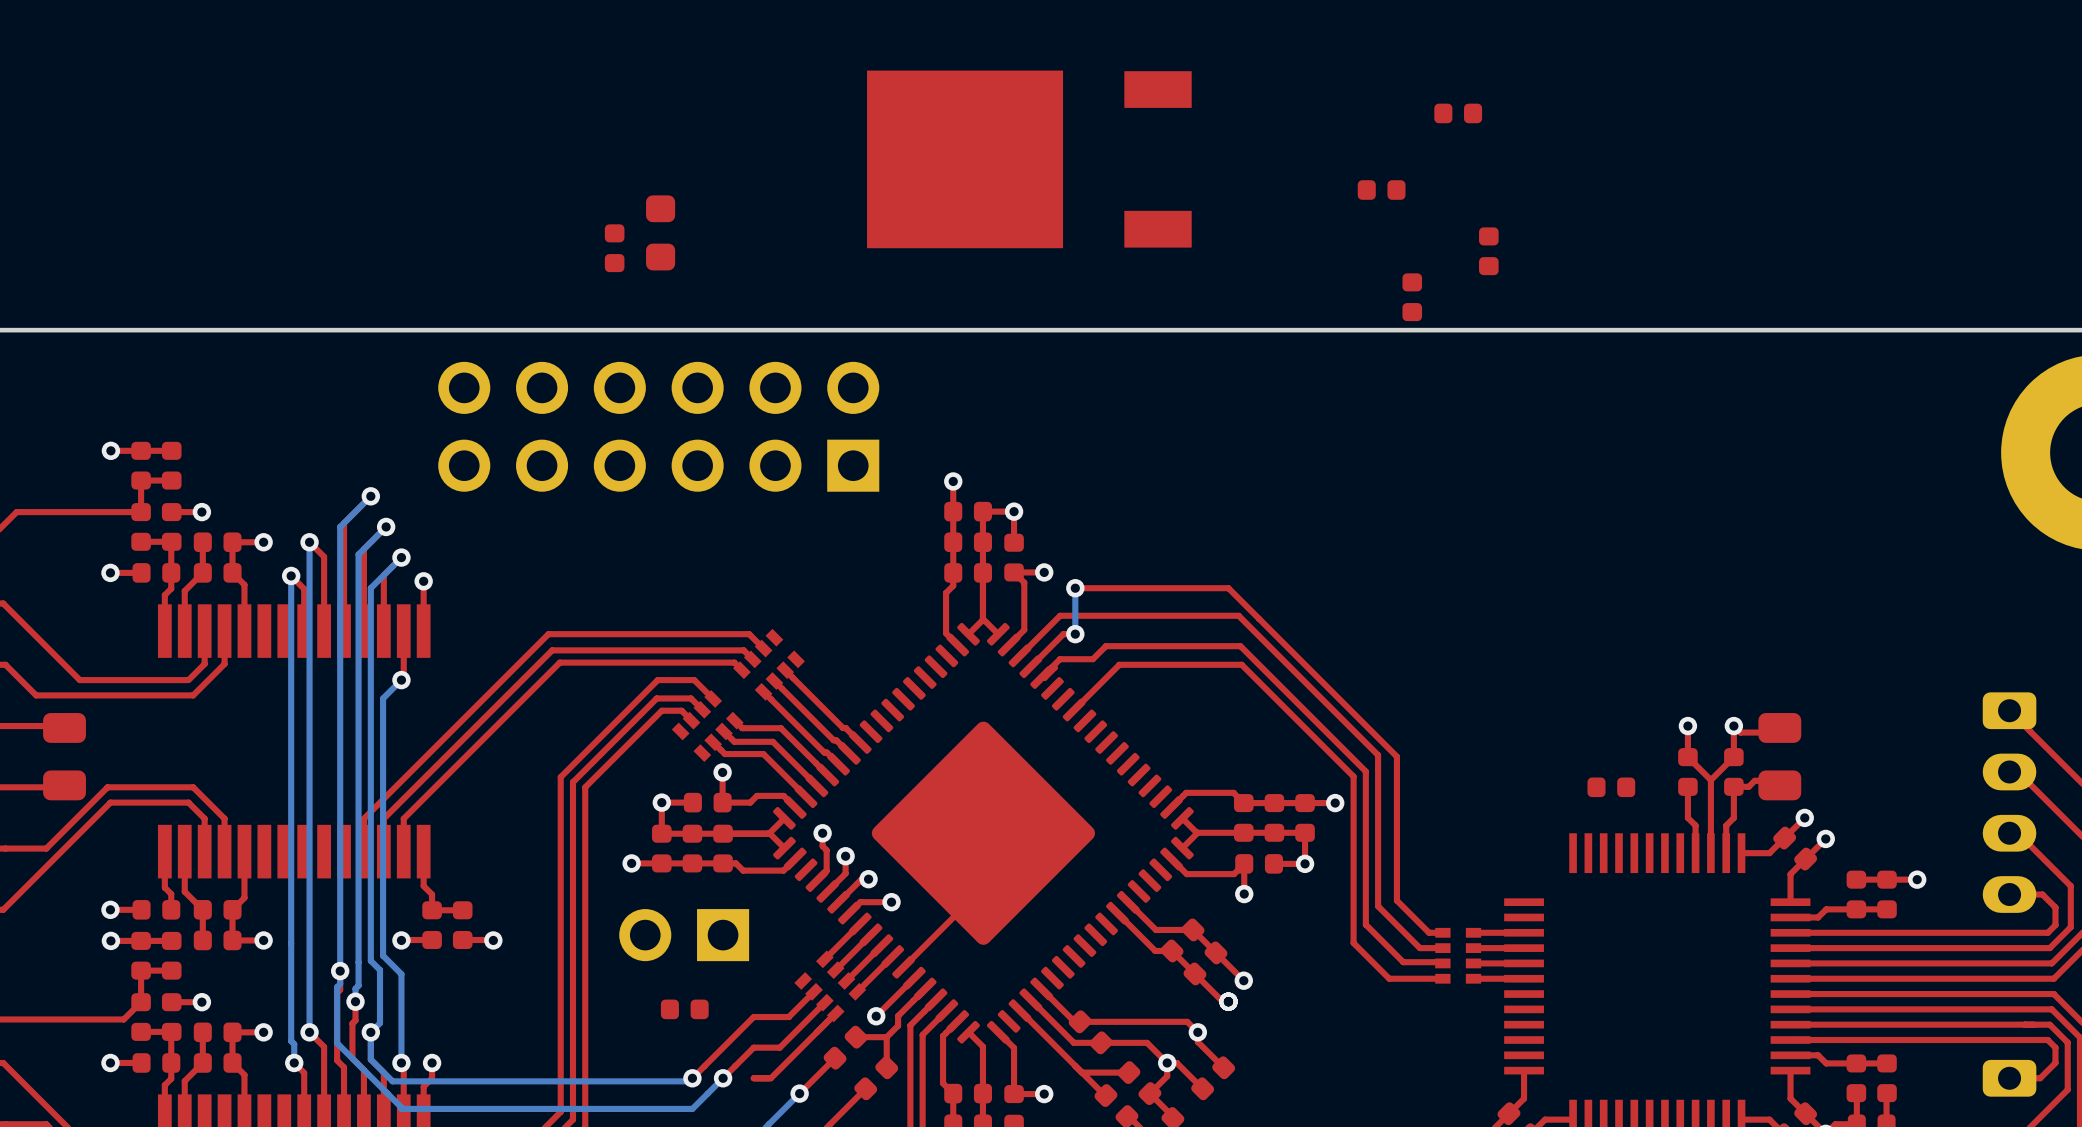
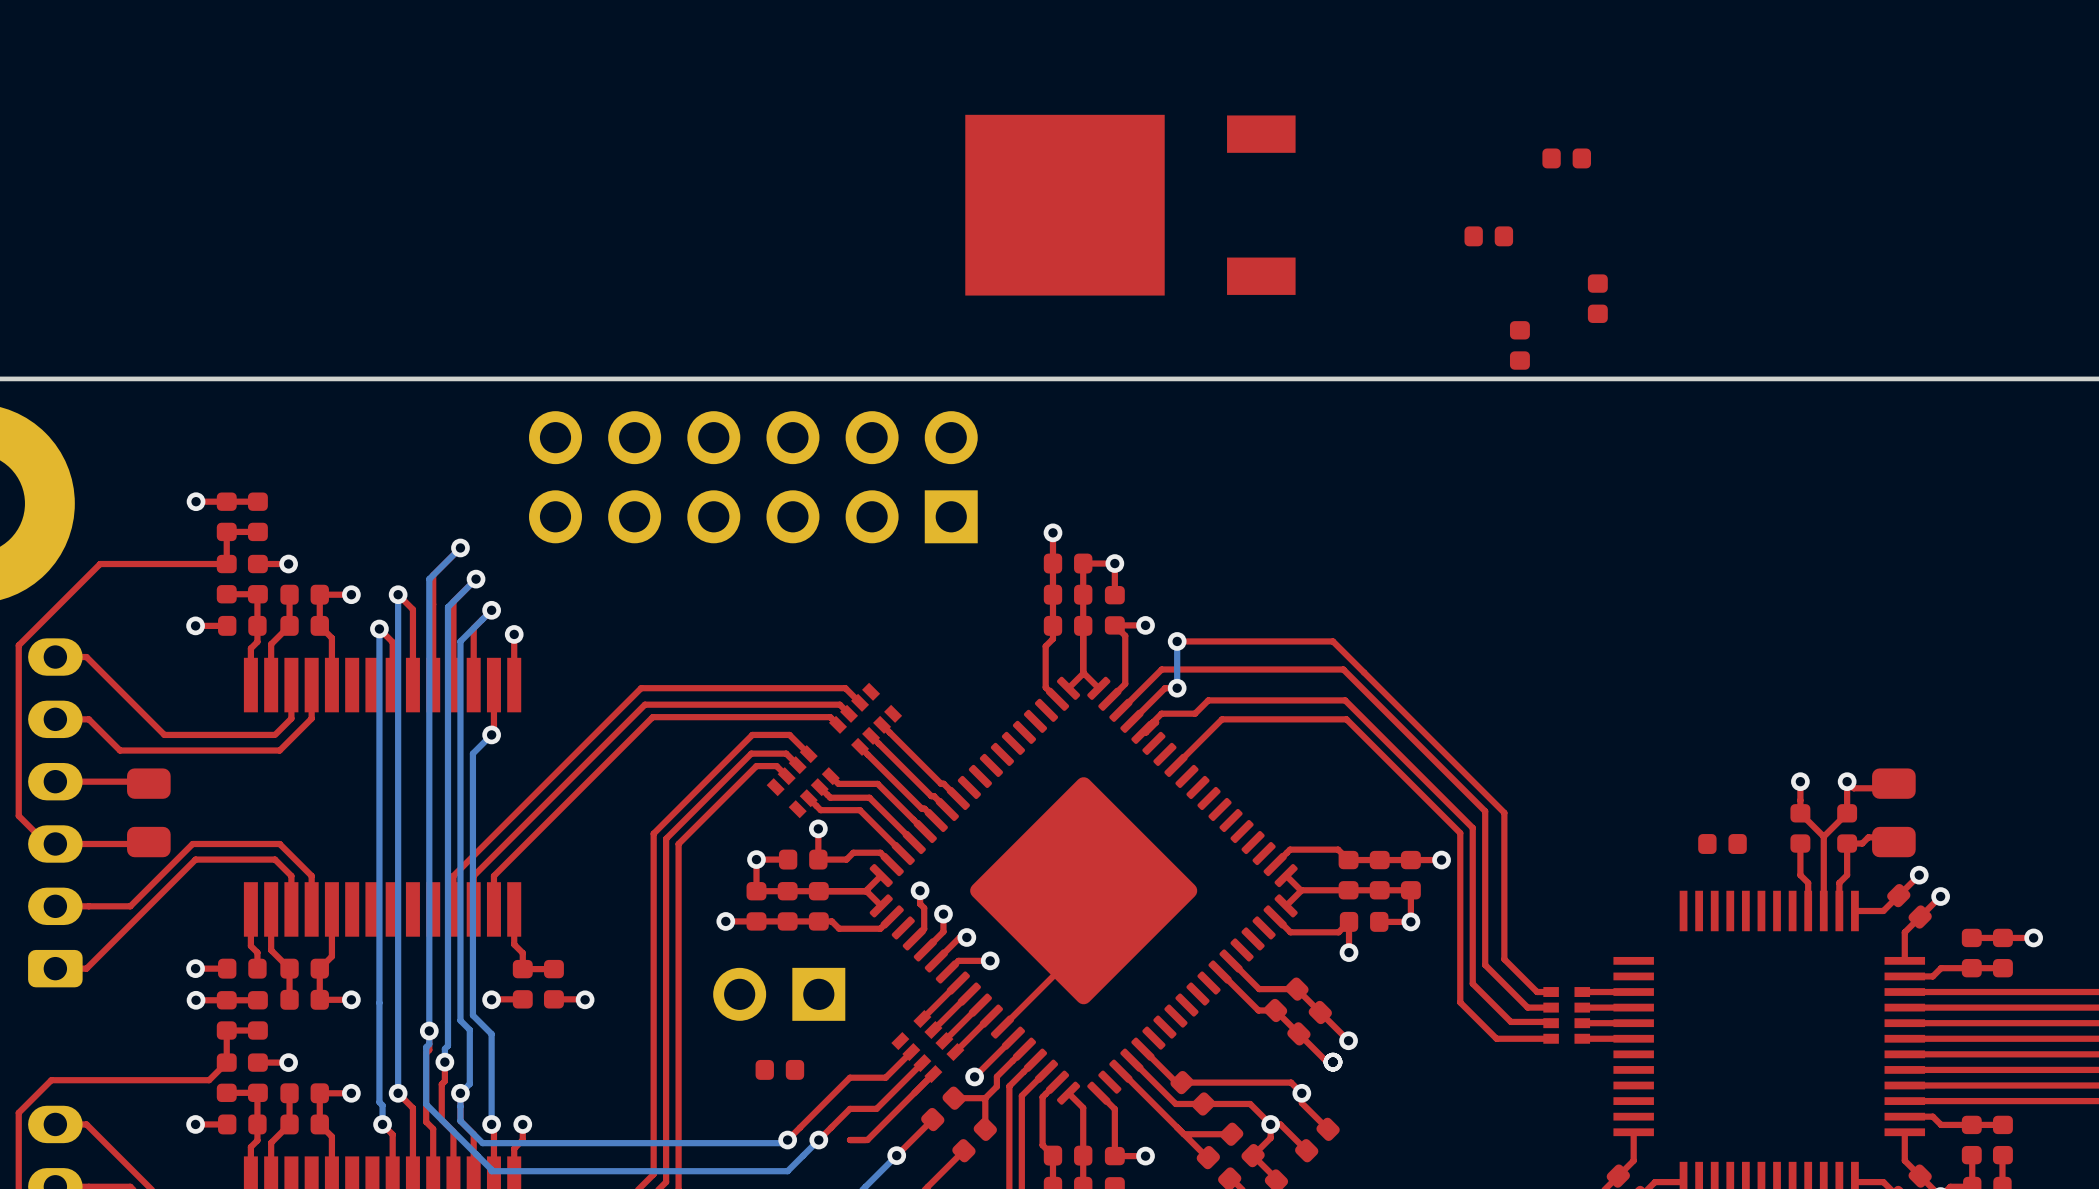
part: (660, 232) -> none
part: (614, 248) -> none

